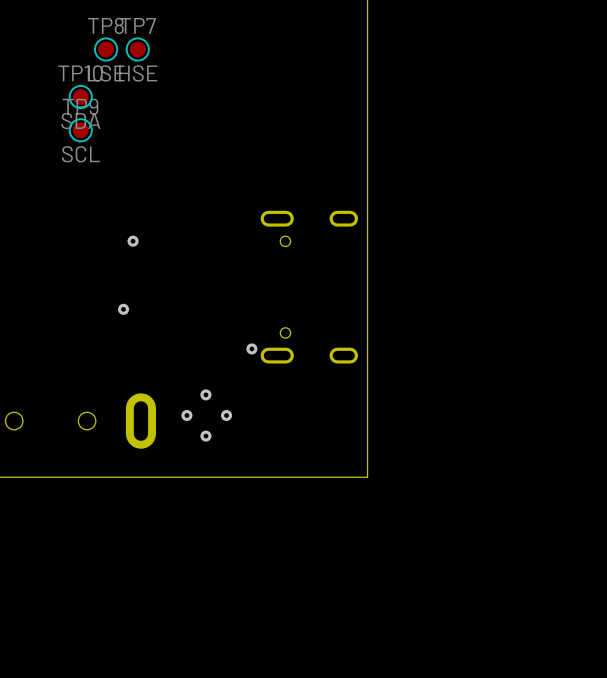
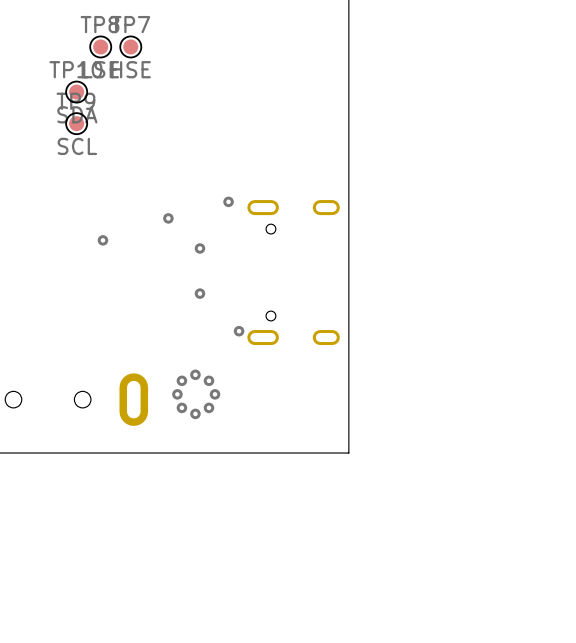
via: none -> (228, 201)
via: none -> (168, 218)
via: (133, 241) -> none
via: none -> (102, 240)
via: none -> (199, 248)
via: (123, 309) -> none
via: none -> (199, 293)
via: none -> (181, 380)
via: none -> (208, 380)
via: none -> (181, 407)
via: none -> (208, 407)

